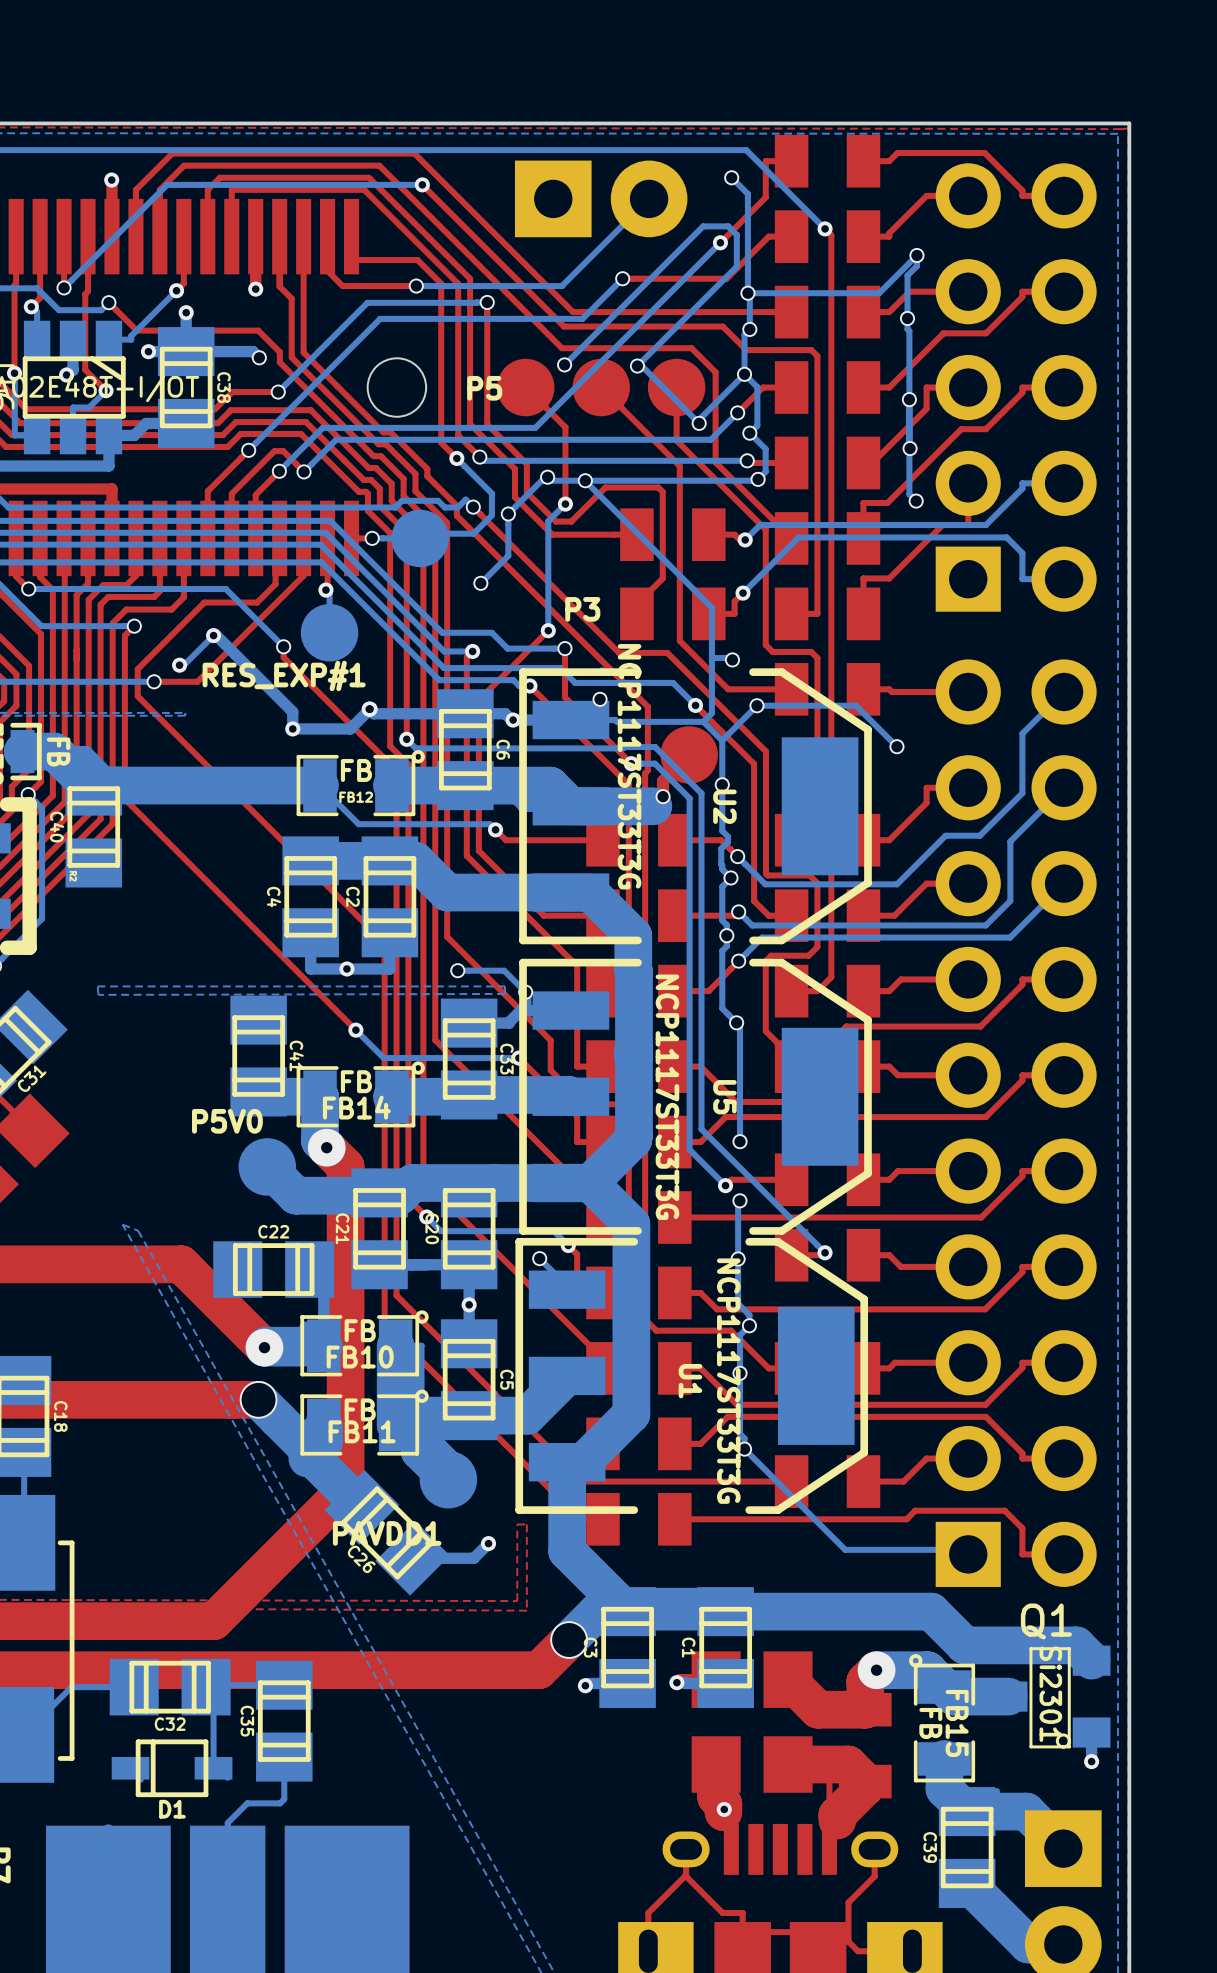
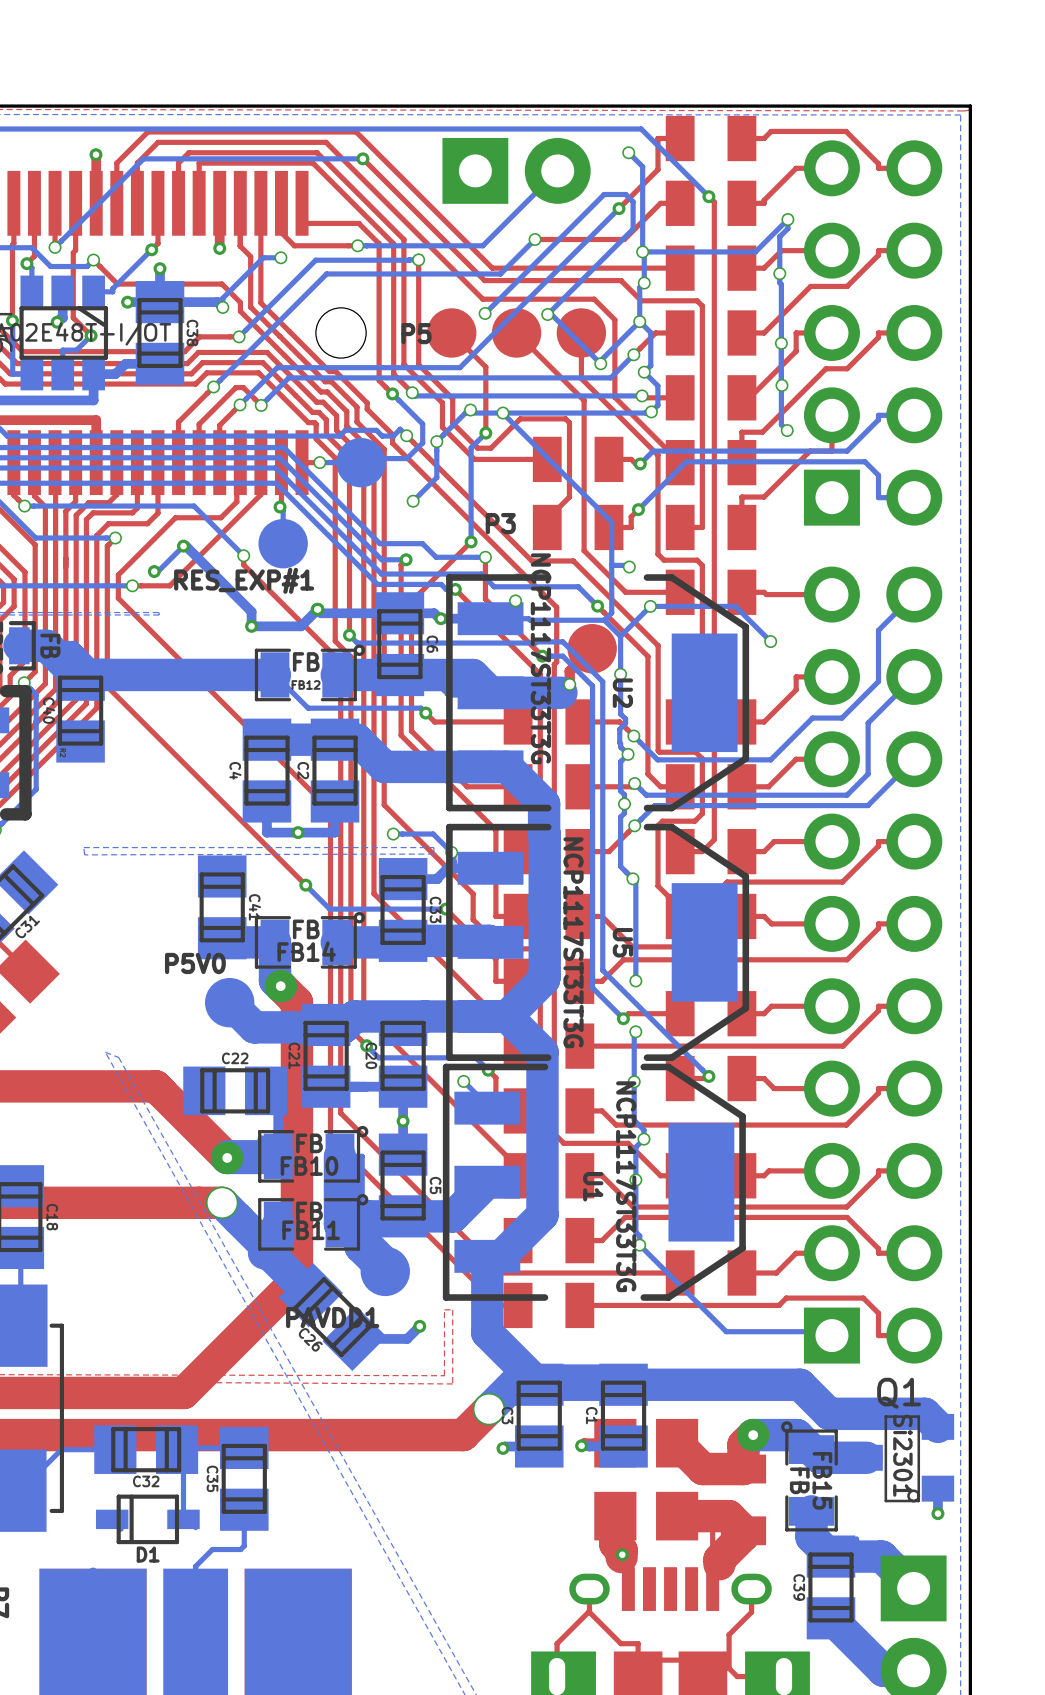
bottom track: none -> (280, 257) (263, 257) (222, 298) (222, 307)
via: none -> (280, 257)

